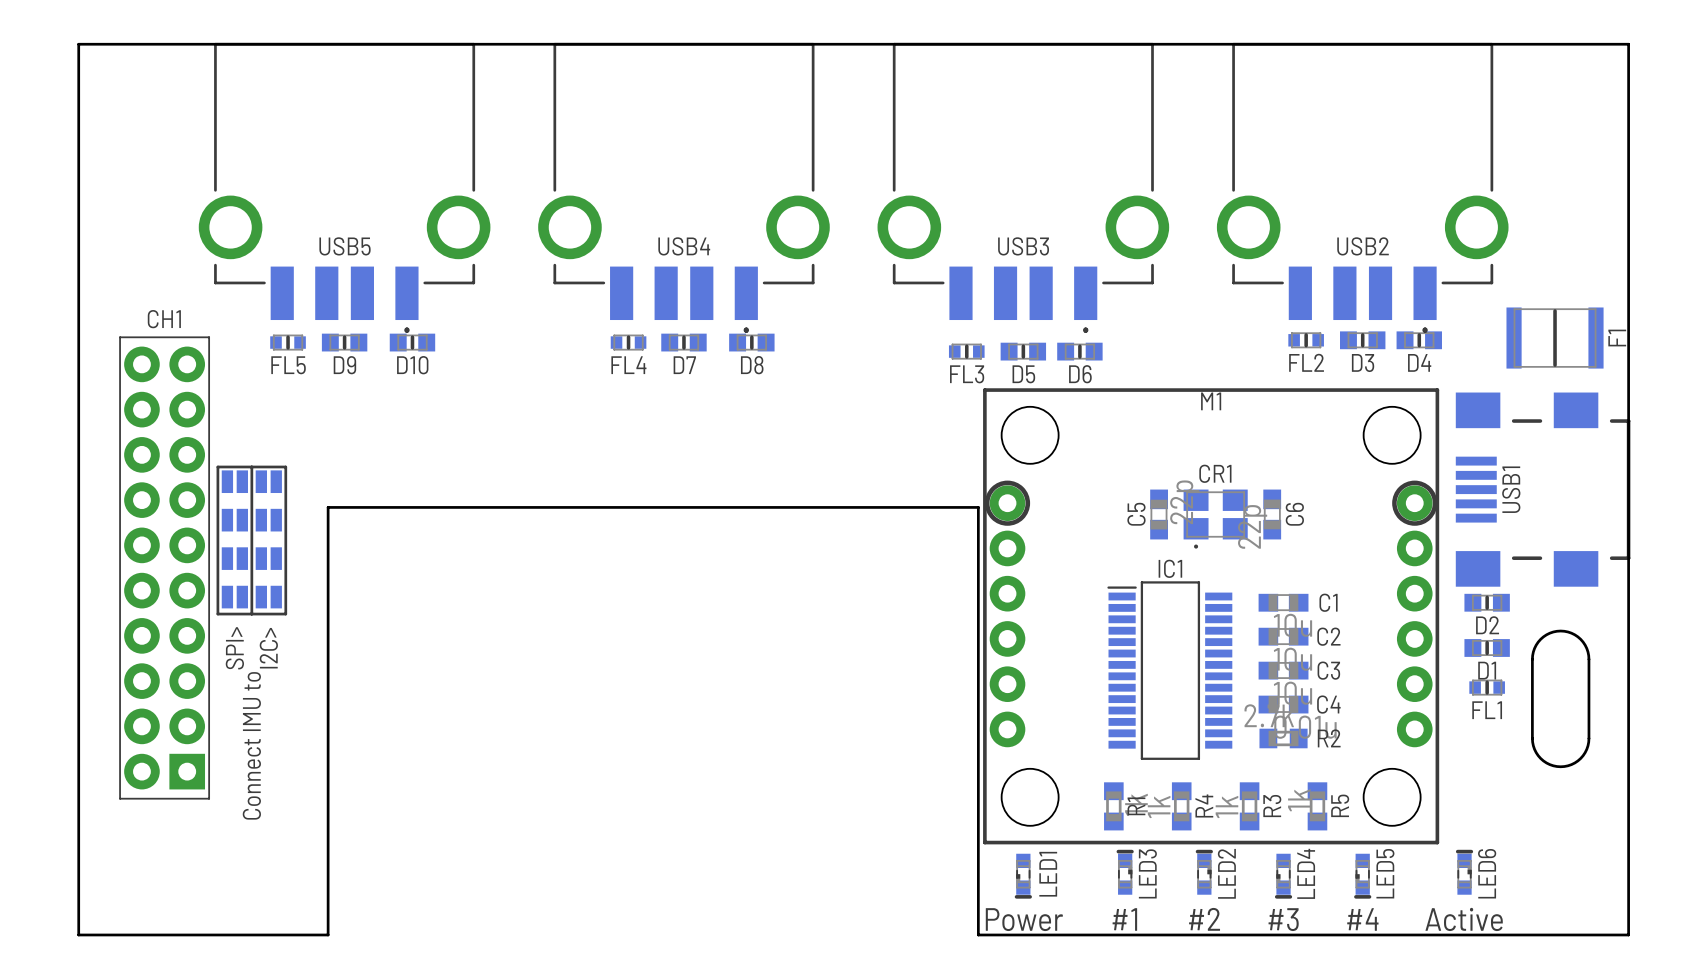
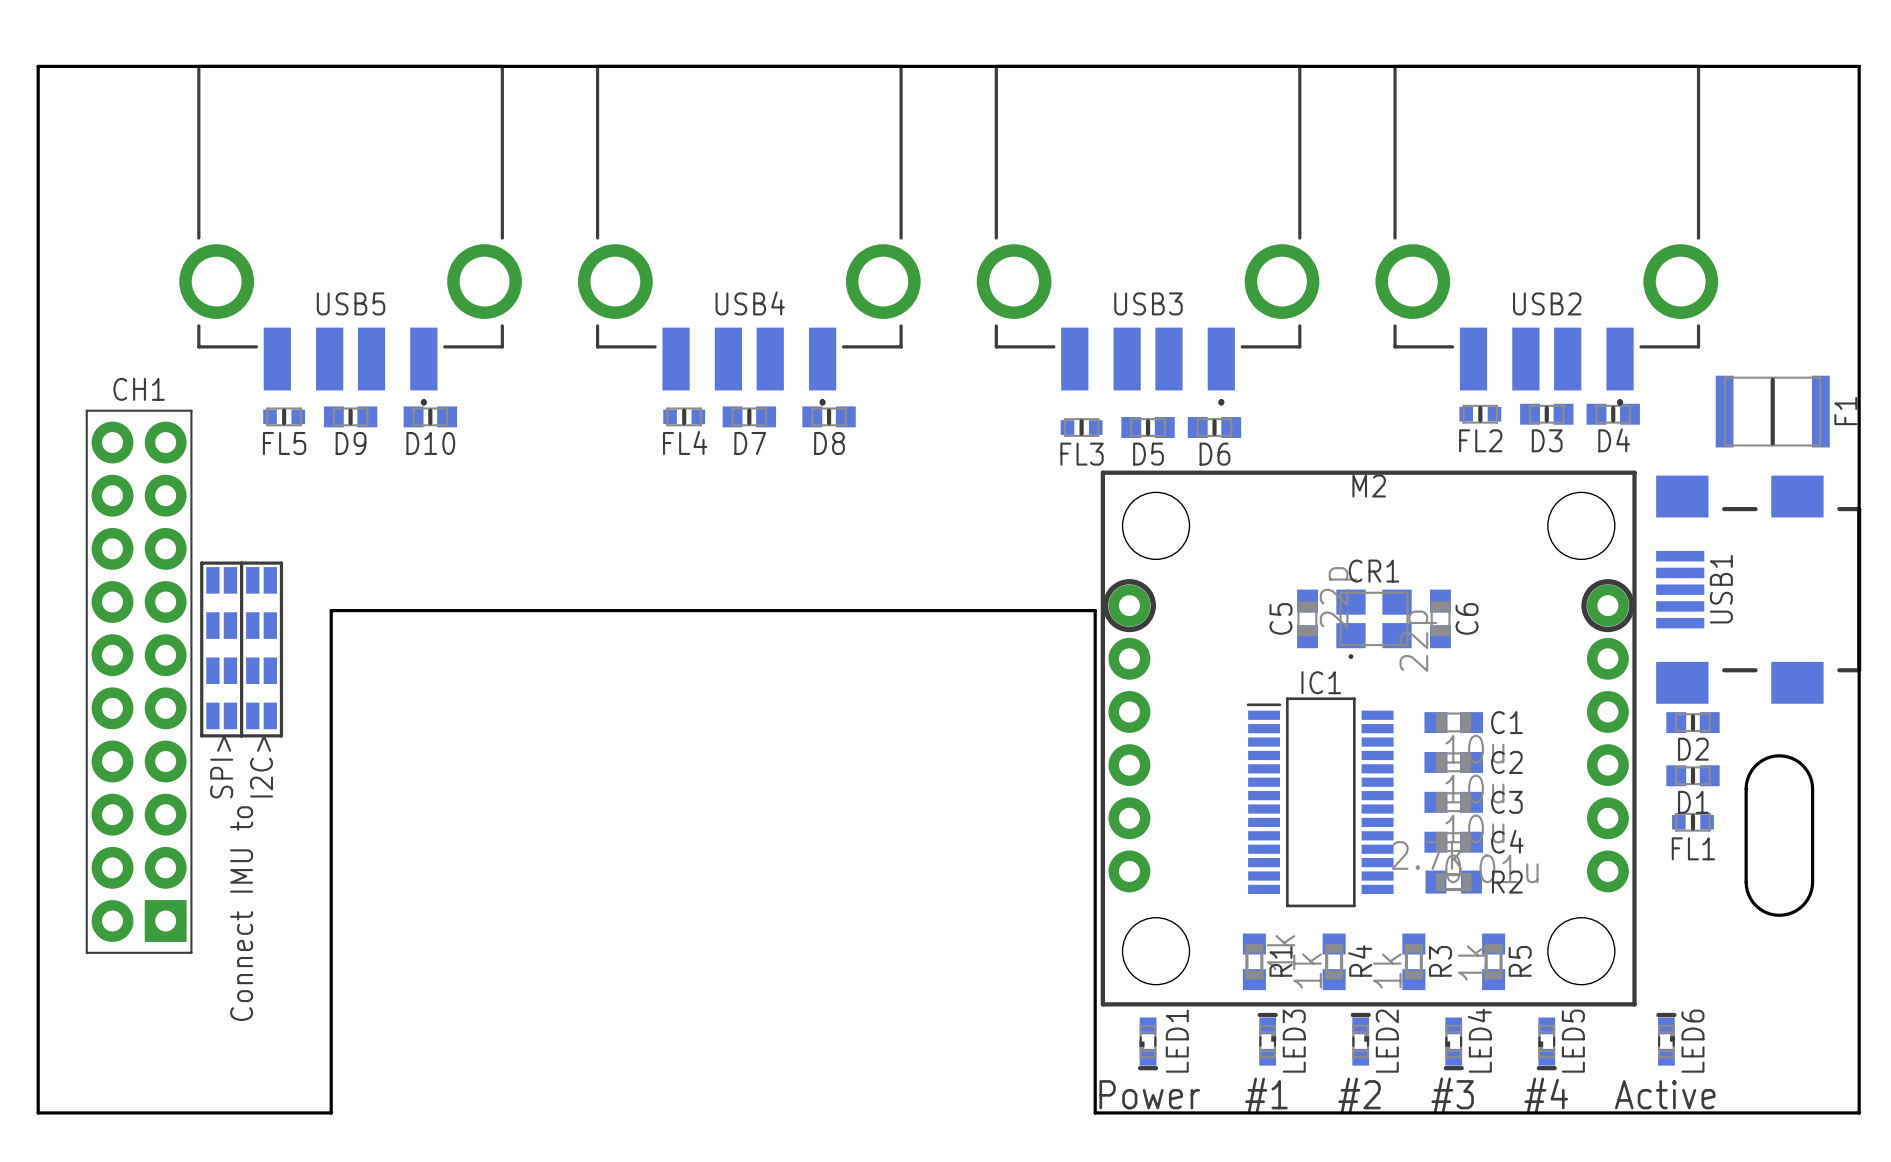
M1 name: M1 (1211, 401) -> M2 (1369, 486)

